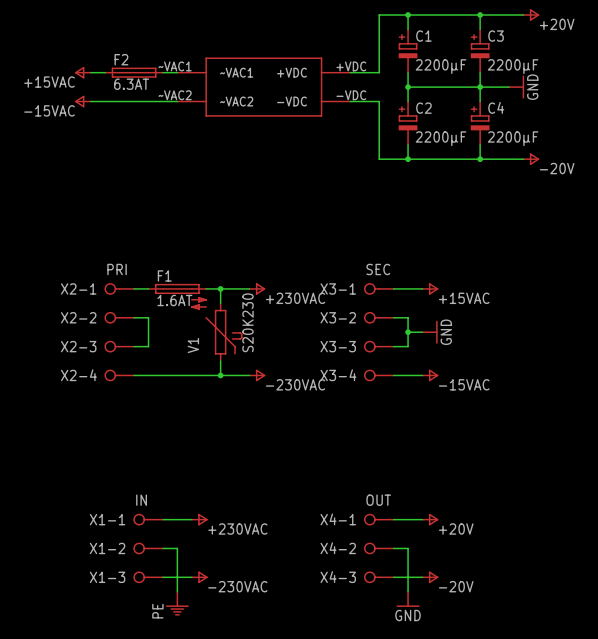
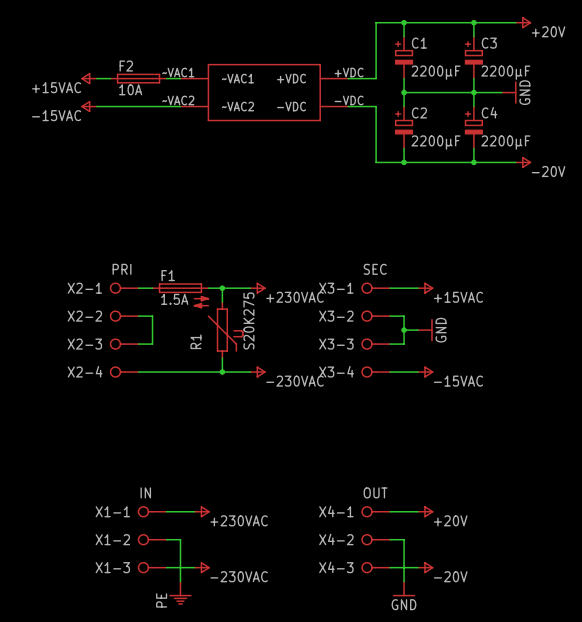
F2 value: 6.3AT (131, 84) -> 10A (130, 89)
F1 value: 1.6AT (174, 300) -> 1.5A (174, 299)
V1 value: S20K230 (248, 322) -> S20K275 (248, 321)
V1 name: V1 (193, 345) -> R1 (195, 341)

